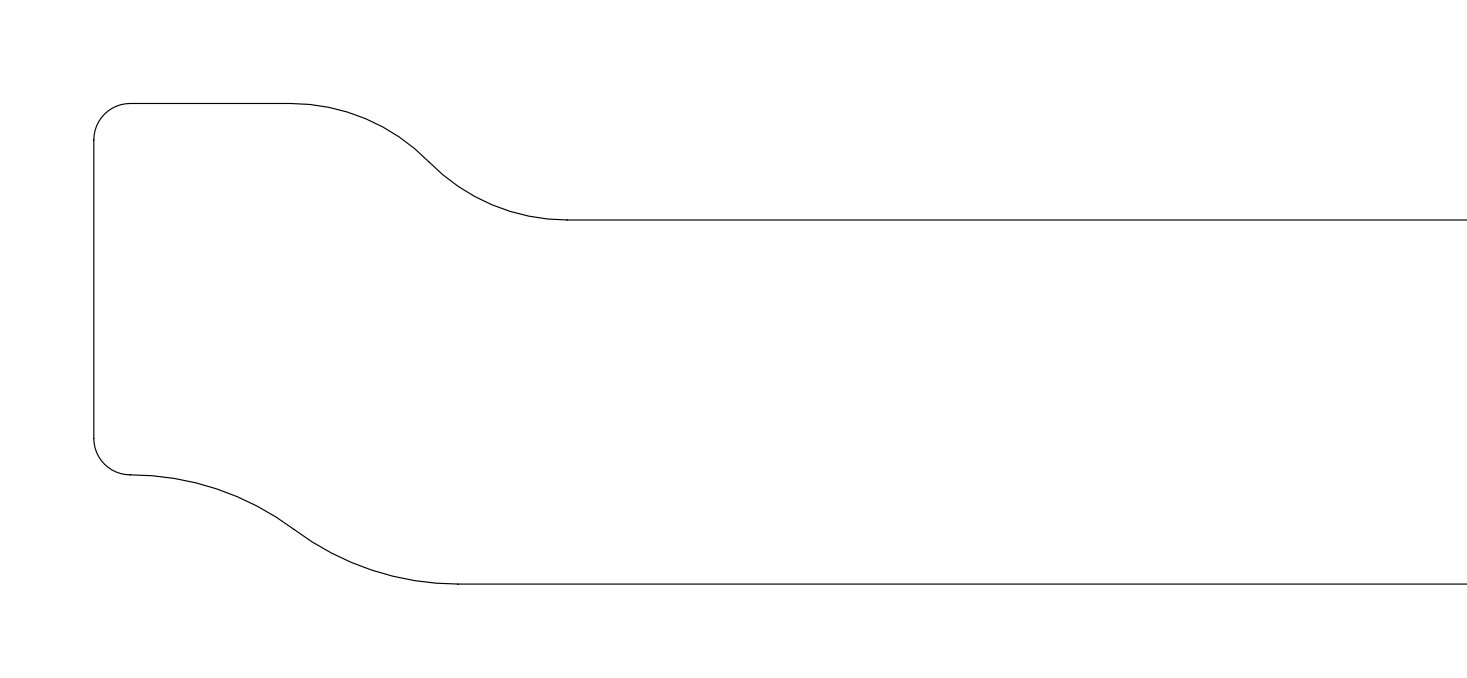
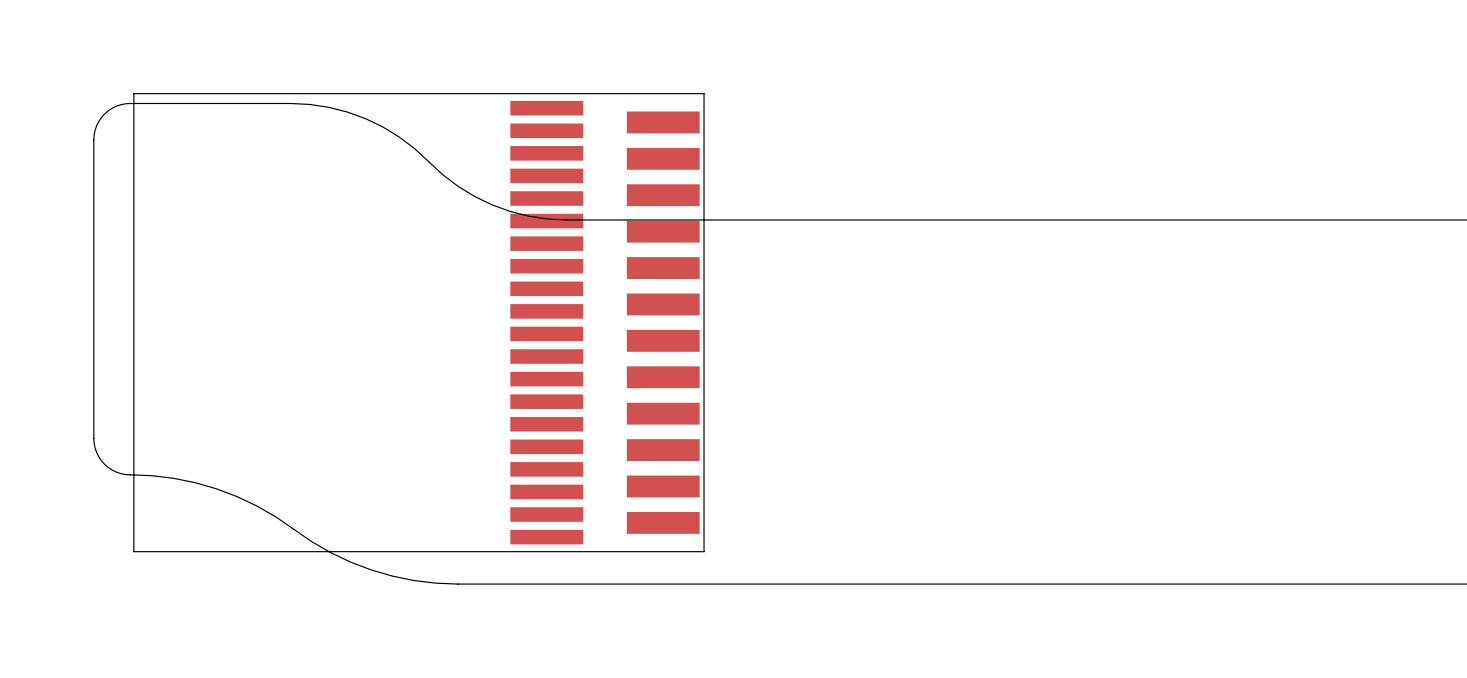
board edge: none -> (133, 93) (704, 93) (704, 551) (133, 551) (133, 93)
part: none -> (604, 322)

